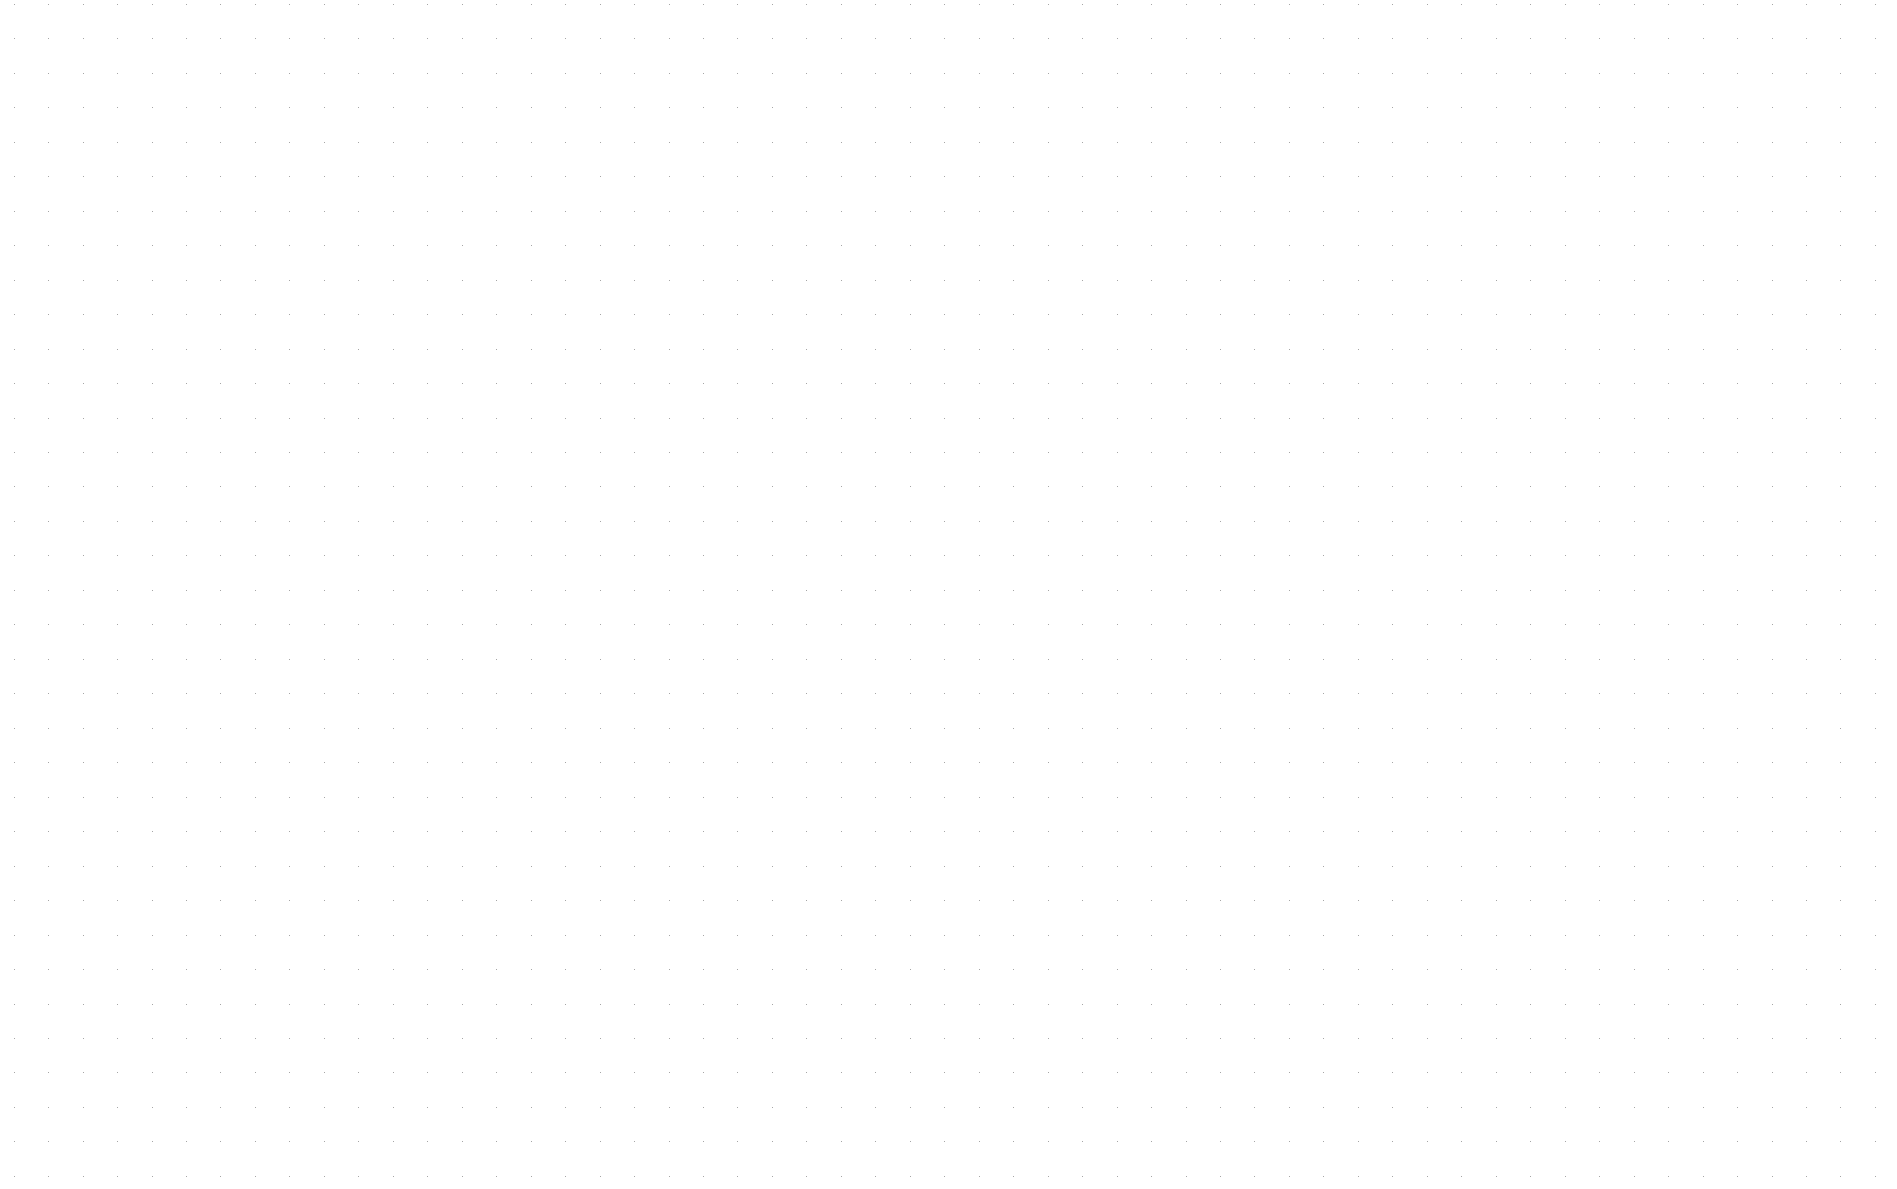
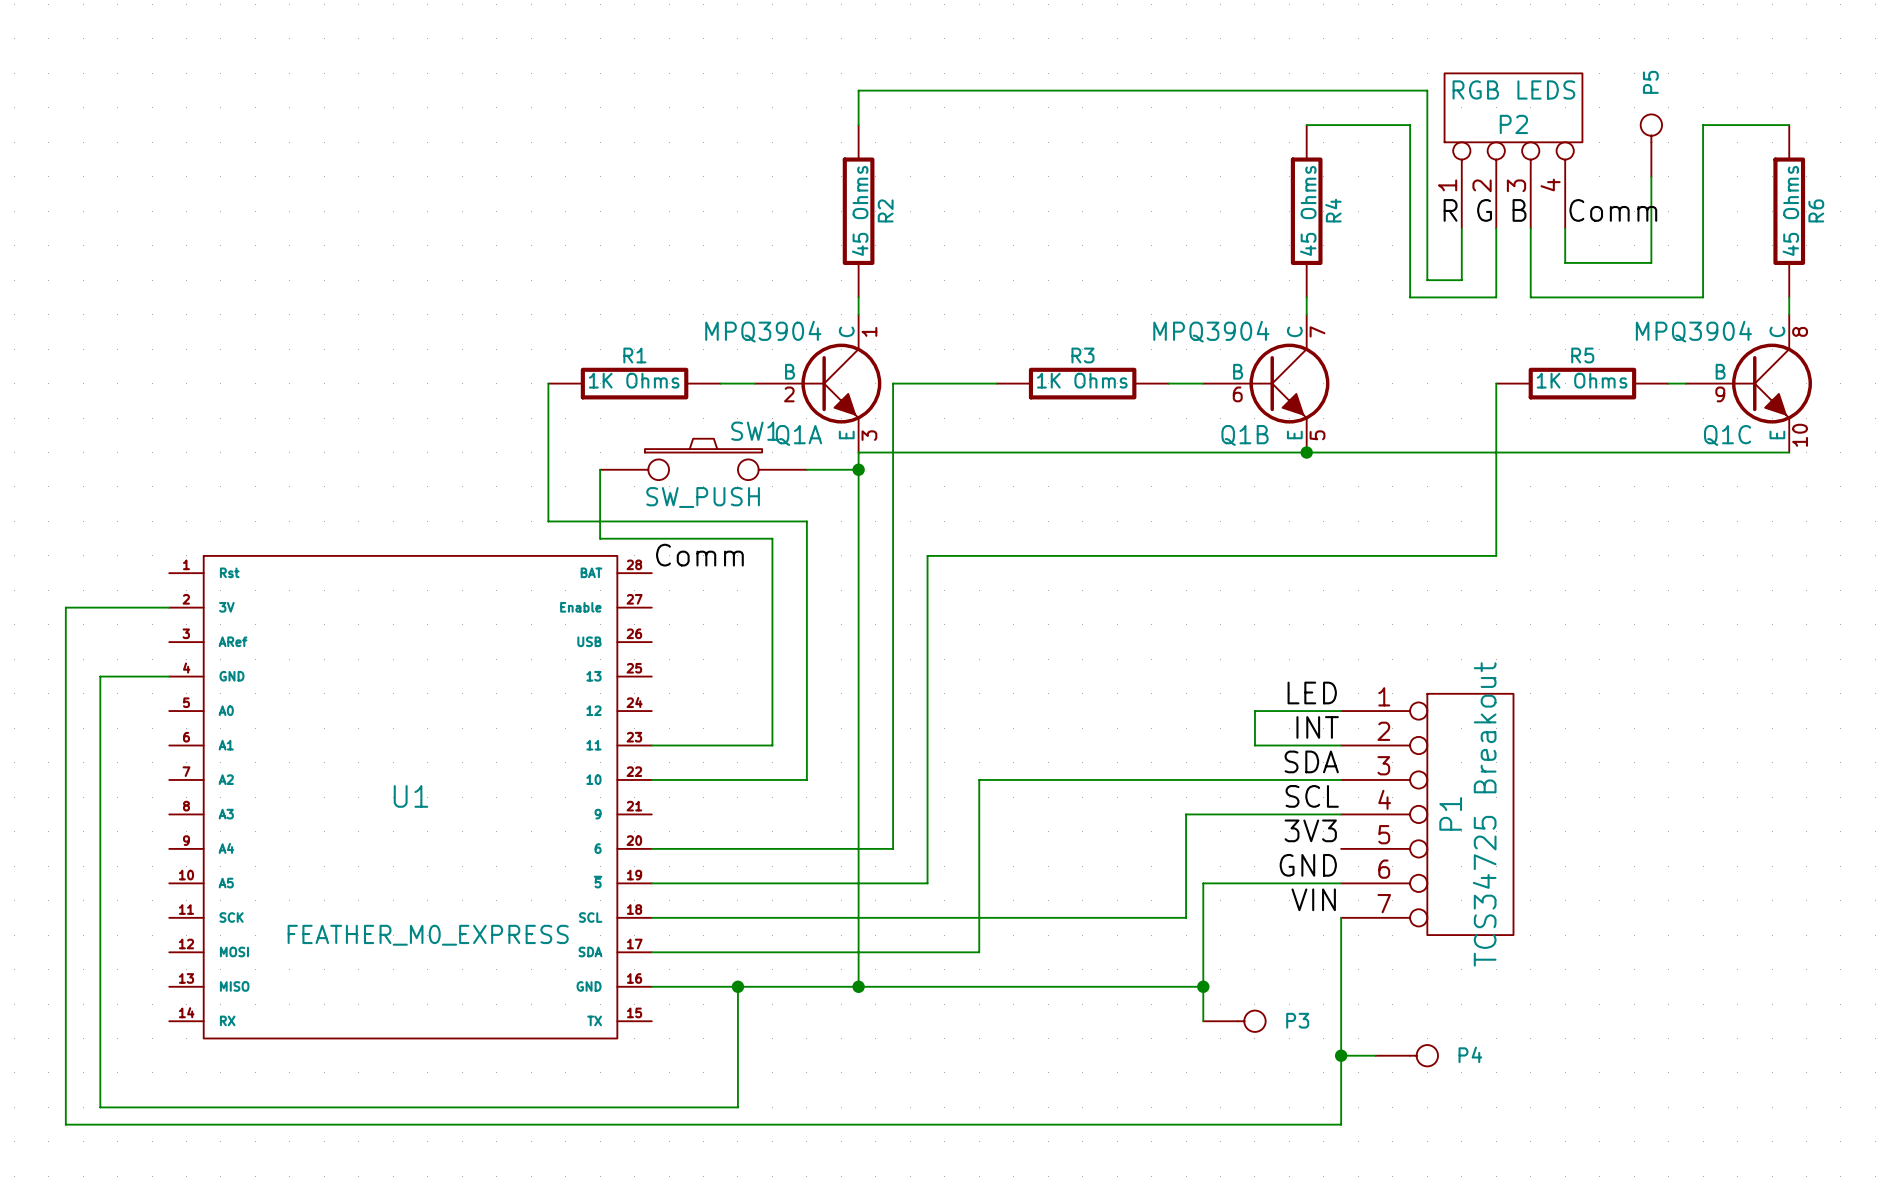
wire: none -> (858, 125) (858, 90) (1427, 90) (1427, 280) (1461, 280) (1461, 228)
wire: none -> (1306, 125) (1410, 125) (1410, 297) (1496, 297) (1496, 228)
wire: none -> (1789, 125) (1703, 125) (1703, 297) (1530, 297) (1530, 228)
P5: none -> (1651, 145)
P2: none -> RGB LEDS (1513, 150)
wire: none -> (1651, 176) (1651, 262) (1565, 262) (1565, 228)
label: none -> R (1450, 210)
label: none -> G (1484, 210)
label: none -> B (1519, 210)
label: none -> Comm (1613, 210)
R2: none -> 45 Ohms (858, 211)
R4: none -> 45 Ohms (1306, 211)
R6: none -> 45 Ohms (1789, 211)
wire: none -> (858, 297) (858, 314)
wire: none -> (1306, 297) (1306, 314)
wire: none -> (1789, 297) (1789, 314)
wire: none -> (548, 383) (548, 521) (806, 521) (806, 779) (651, 779)
R1: none -> 1K Ohms (634, 383)
wire: none -> (720, 383) (755, 383)
Q1A: none -> MPQ3904 (818, 383)
wire: none -> (996, 383) (893, 383) (893, 848) (651, 848)
R3: none -> 1K Ohms (1082, 383)
wire: none -> (1168, 383) (1203, 383)
Q1B: none -> MPQ3904 (1266, 383)
wire: none -> (1496, 383) (1496, 555) (927, 555) (927, 883) (651, 883)
R5: none -> 1K Ohms (1582, 383)
wire: none -> (1668, 383) (1685, 383)
Q1C: none -> MPQ3904 (1748, 383)
junction: none -> (1306, 452)
wire: none -> (1789, 452) (858, 452) (858, 986)
SW1: none -> SW_PUSH (703, 459)
wire: none -> (600, 469) (600, 538) (772, 538) (772, 745) (651, 745)
wire: none -> (806, 469) (858, 469)
junction: none -> (858, 469)
label: none -> Comm (699, 555)
wire: none -> (169, 607) (65, 607) (65, 1124) (1341, 1124) (1341, 917)
wire: none -> (169, 676) (100, 676) (100, 1107) (737, 1107) (737, 986)
label: none -> LED (1312, 692)
wire: none -> (1341, 711) (1254, 711) (1254, 745) (1341, 745)
label: none -> INT (1317, 727)
label: none -> SDA (1311, 761)
wire: none -> (1341, 779) (979, 779) (979, 952) (651, 952)
label: none -> SCL (1312, 796)
U1: none -> FEATHER_M0_EXPRESS (410, 797)
wire: none -> (1341, 814) (1186, 814) (1186, 917) (651, 917)
P1: none -> TCS34725 Breakout (1427, 814)
label: none -> 3V3 (1310, 830)
label: none -> GND (1308, 865)
wire: none -> (1341, 883) (1203, 883) (1203, 1021)
label: none -> VIN (1313, 899)
wire: none -> (651, 986) (1203, 986)
junction: none -> (737, 986)
junction: none -> (858, 986)
junction: none -> (1203, 986)
P3: none -> (1234, 1021)
wire: none -> (1341, 1055) (1375, 1055)
junction: none -> (1341, 1055)
P4: none -> (1406, 1055)

